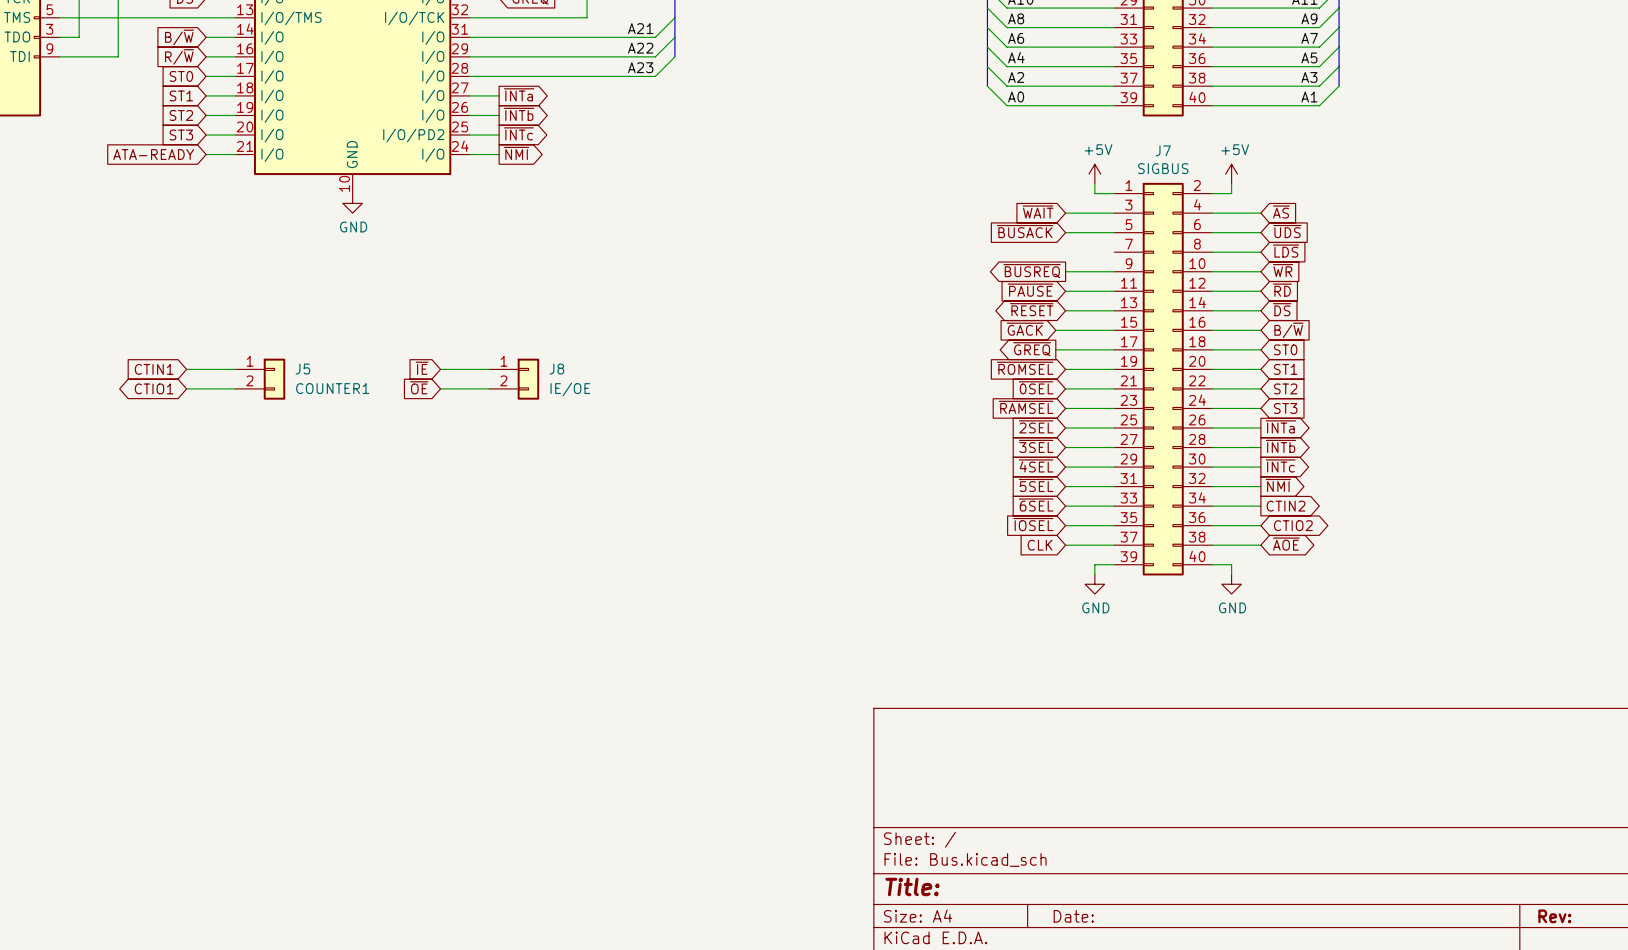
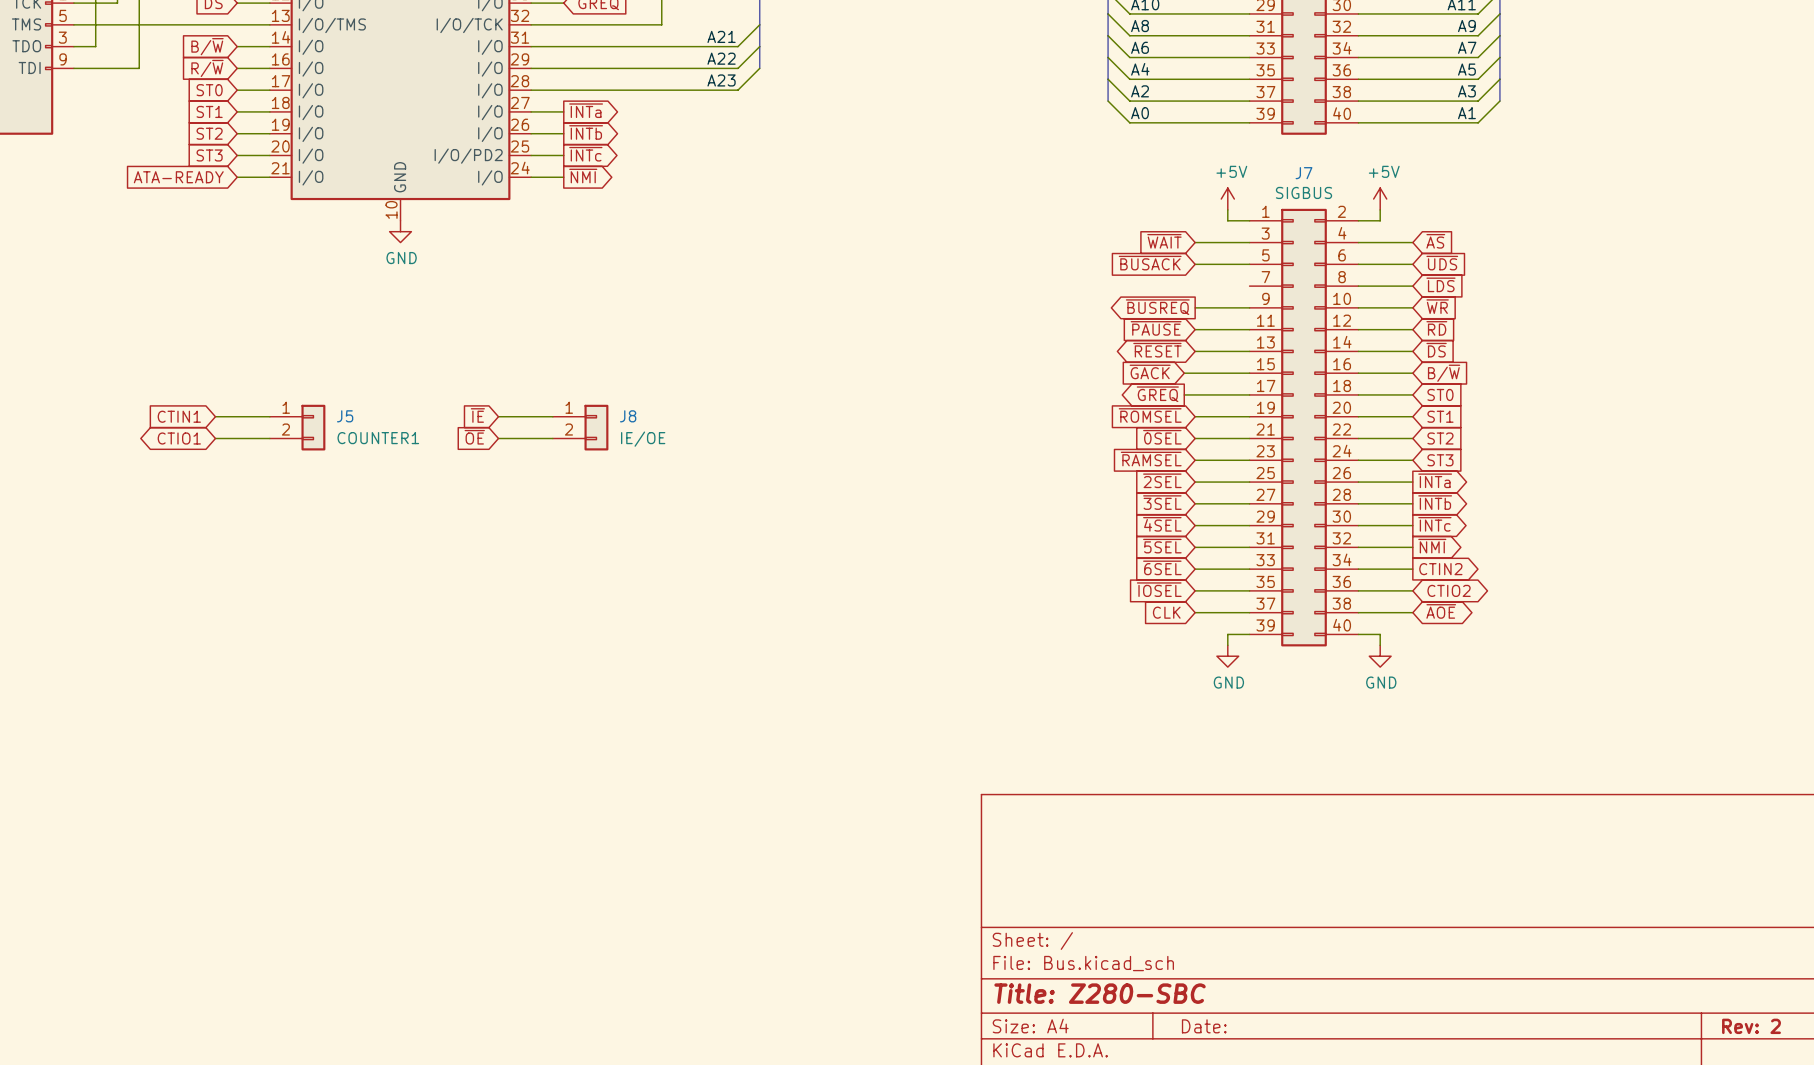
title block: Title: (912, 886) -> Title: Z280-SBC (1100, 993)
title block: Rev: (1554, 916) -> Rev: 2 (1751, 1026)

